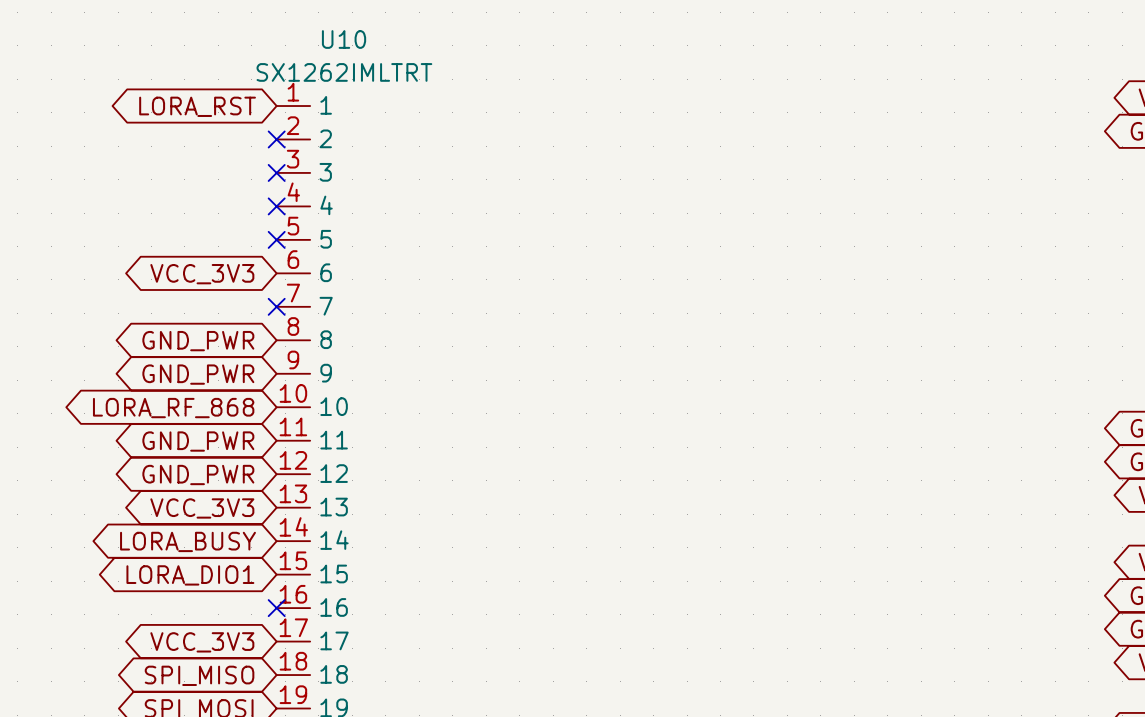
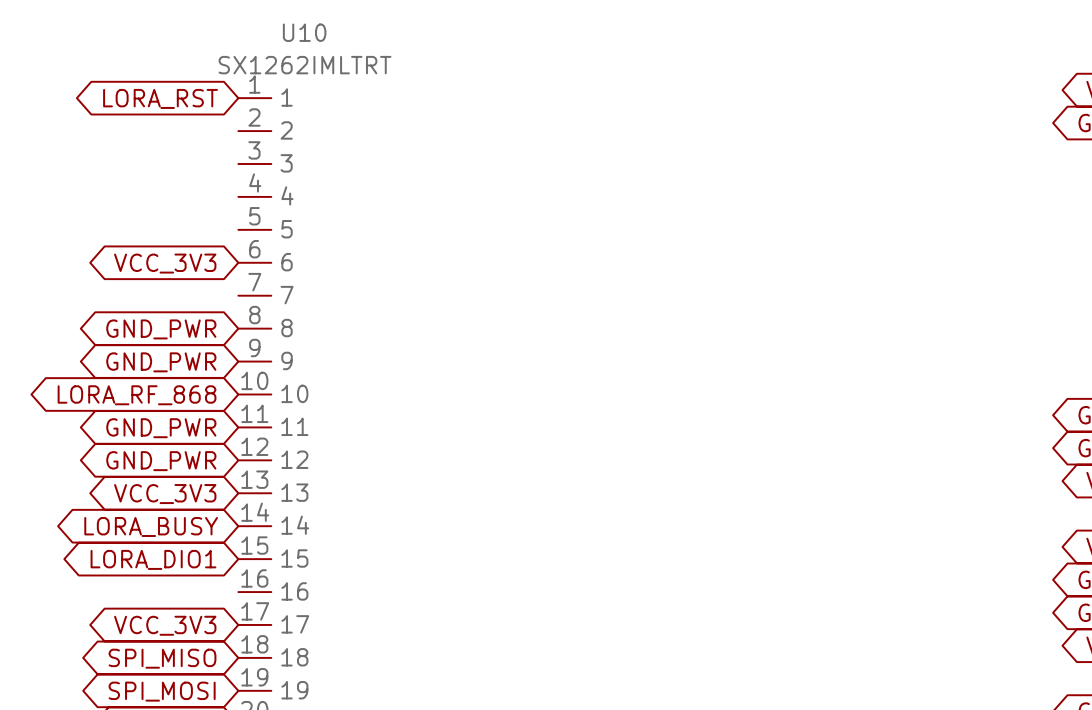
no-connect mark: (276, 139) -> none
no-connect mark: (276, 172) -> none
no-connect mark: (276, 206) -> none
no-connect mark: (276, 239) -> none
no-connect mark: (276, 306) -> none
no-connect mark: (276, 608) -> none

